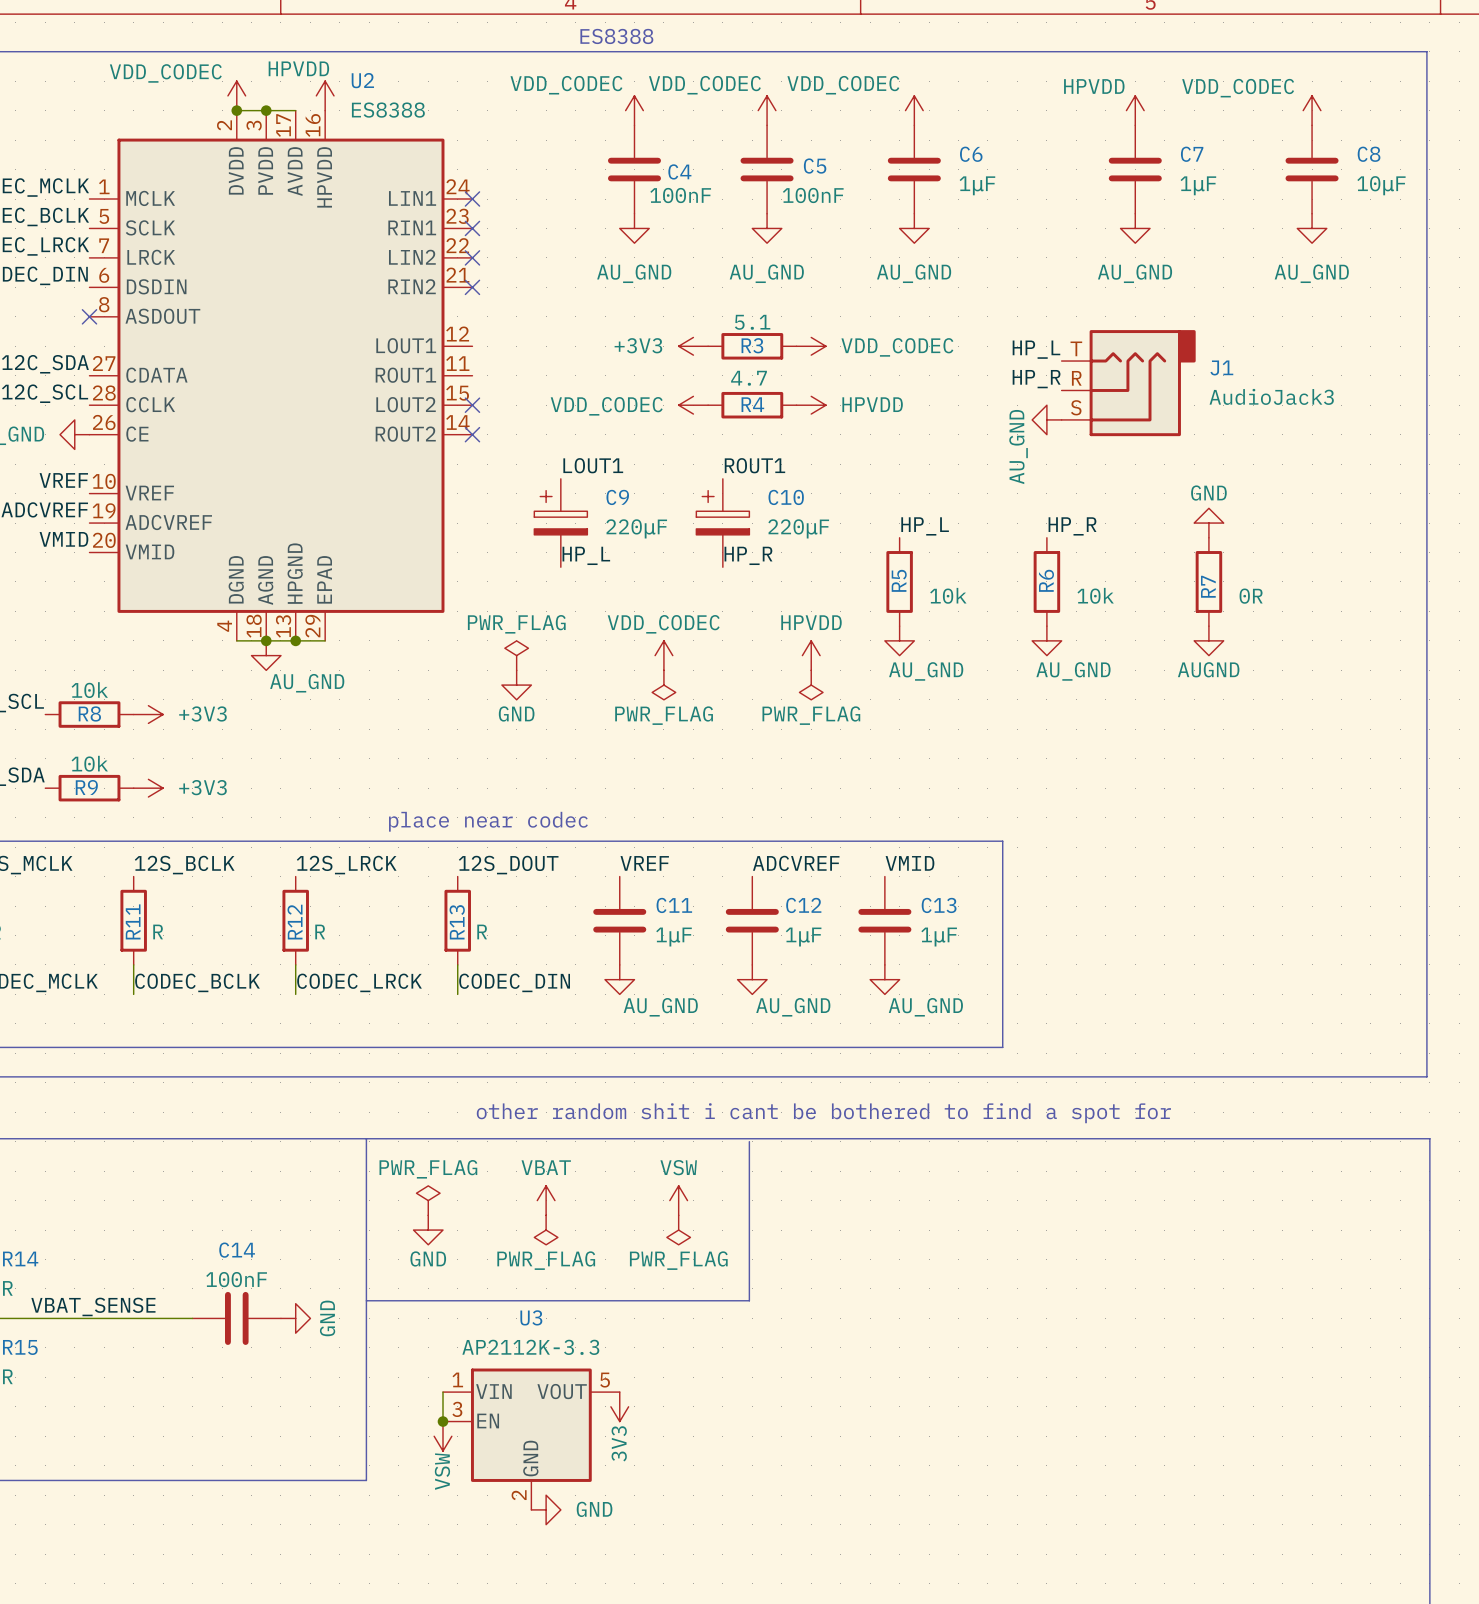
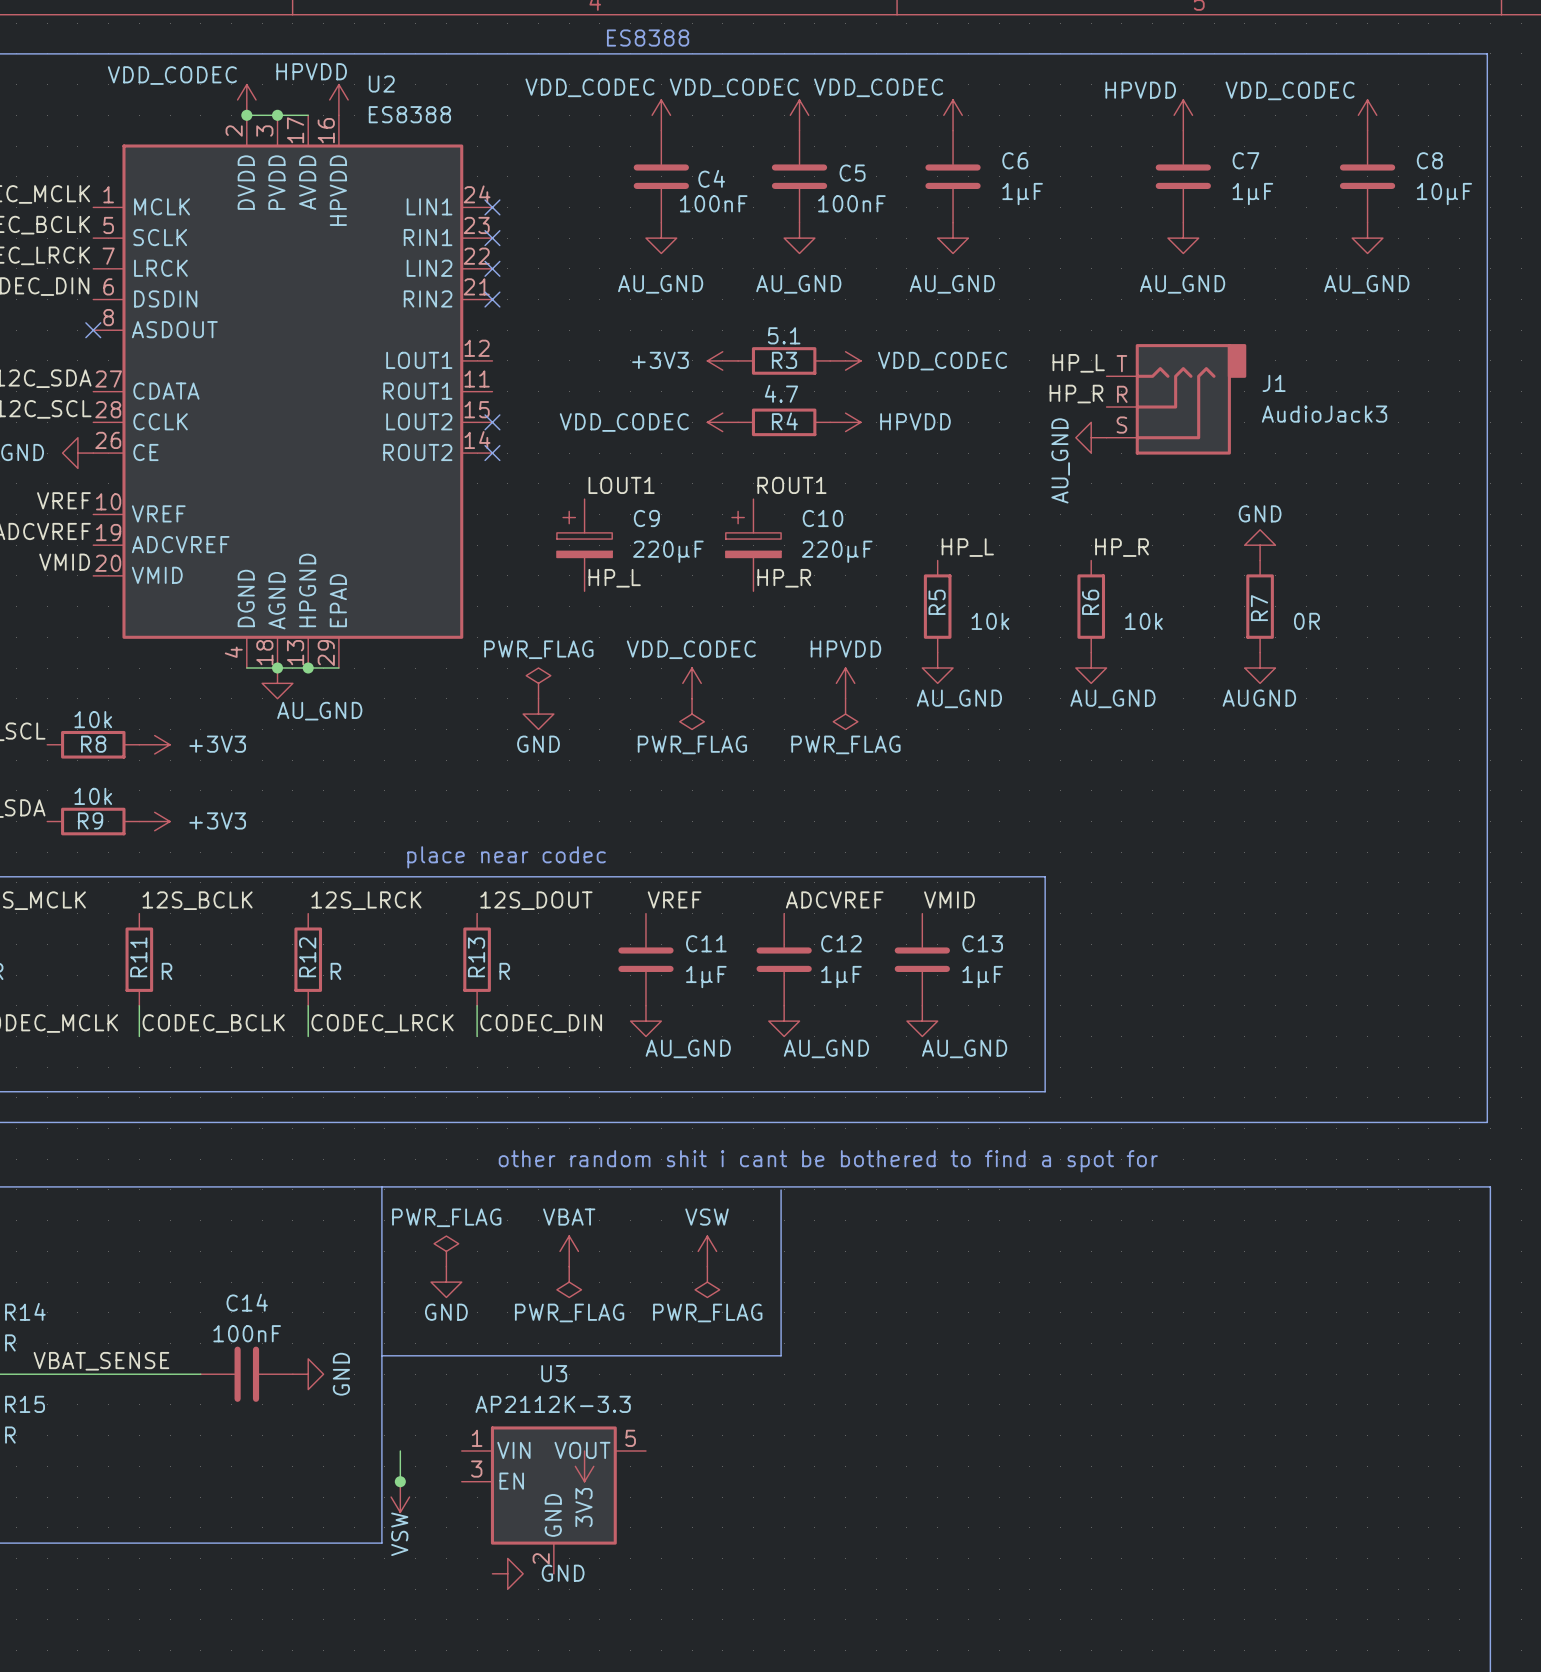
wire: (443, 1392) (443, 1421) -> (400, 1450) (400, 1481)
power symbol position: 3V3 (619, 1406) -> 3V3 (584, 1466)
junction position: (443, 1421) -> (400, 1481)
power symbol position: VSW (443, 1436) -> VSW (400, 1497)
power symbol position: GND (546, 1509) -> GND (507, 1573)

